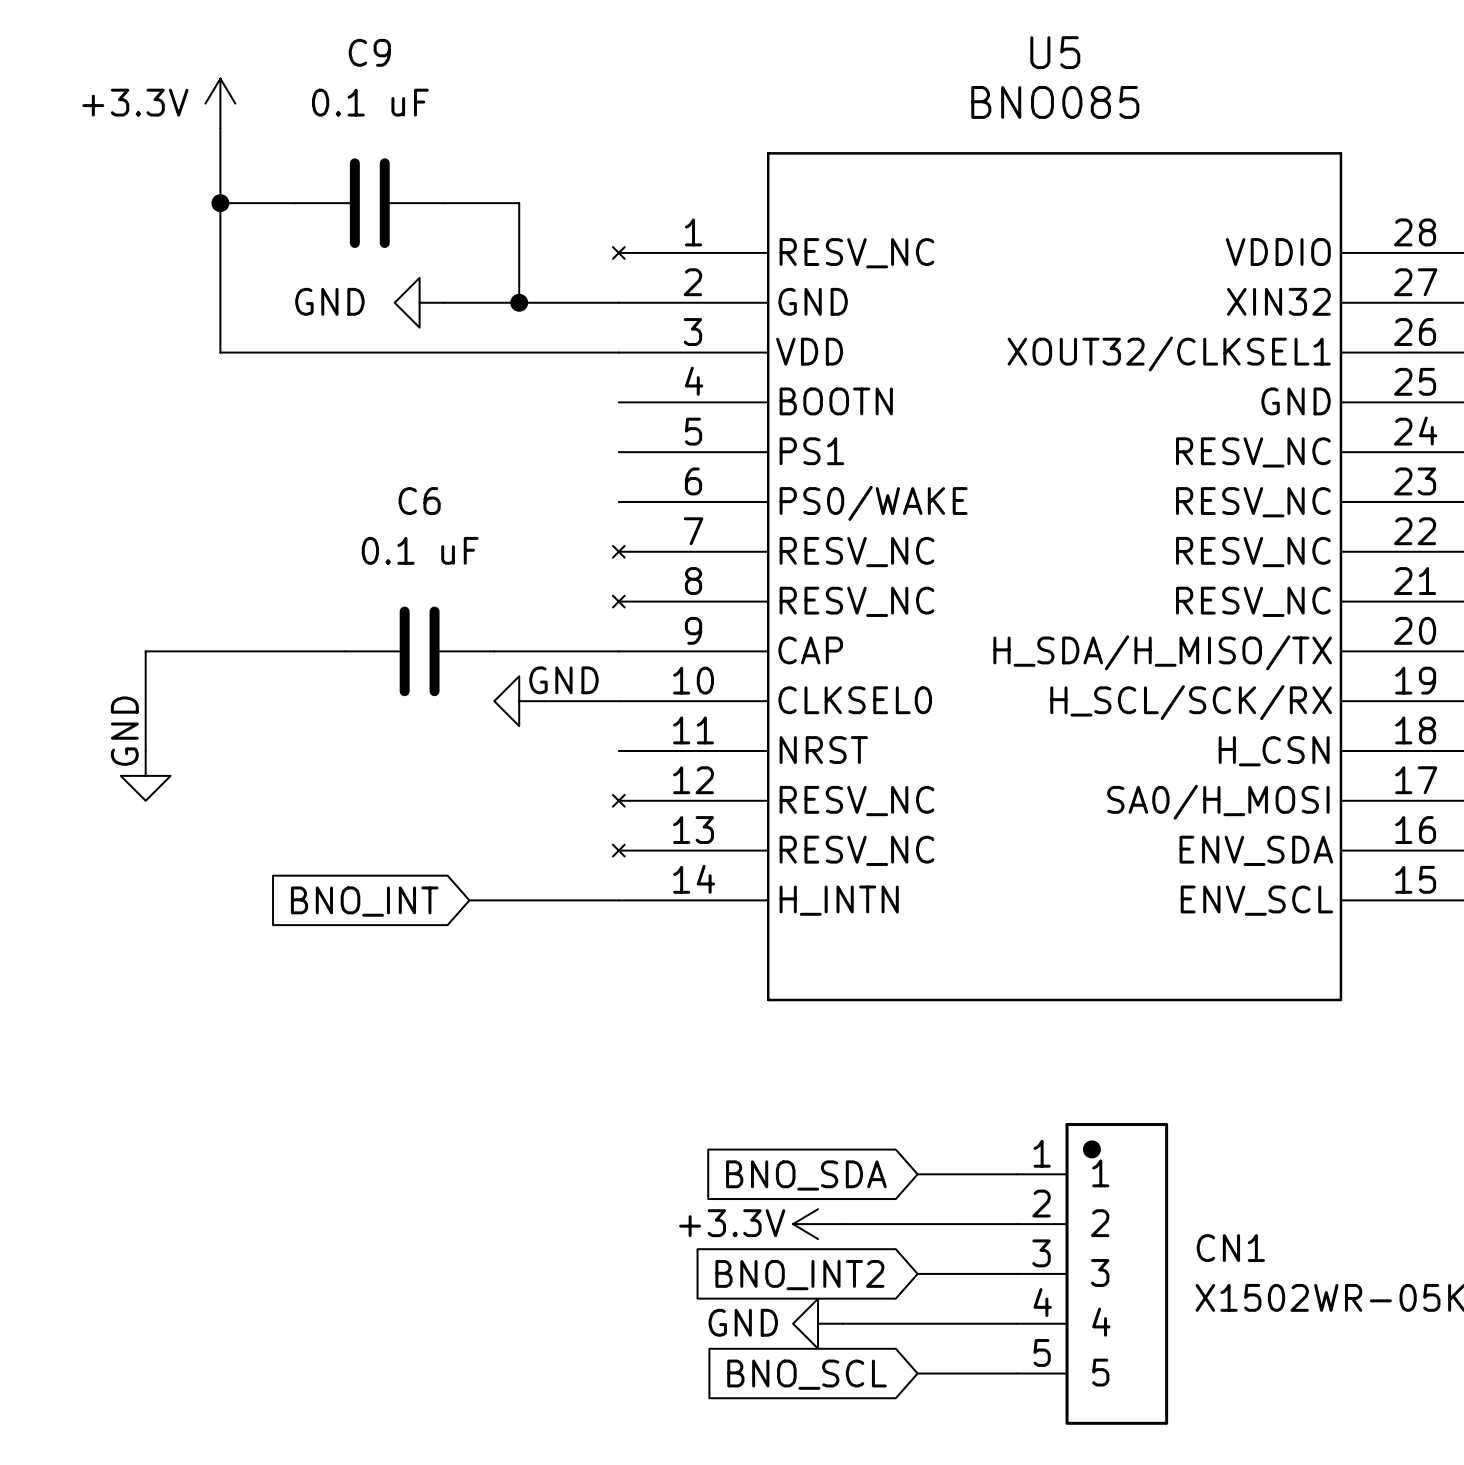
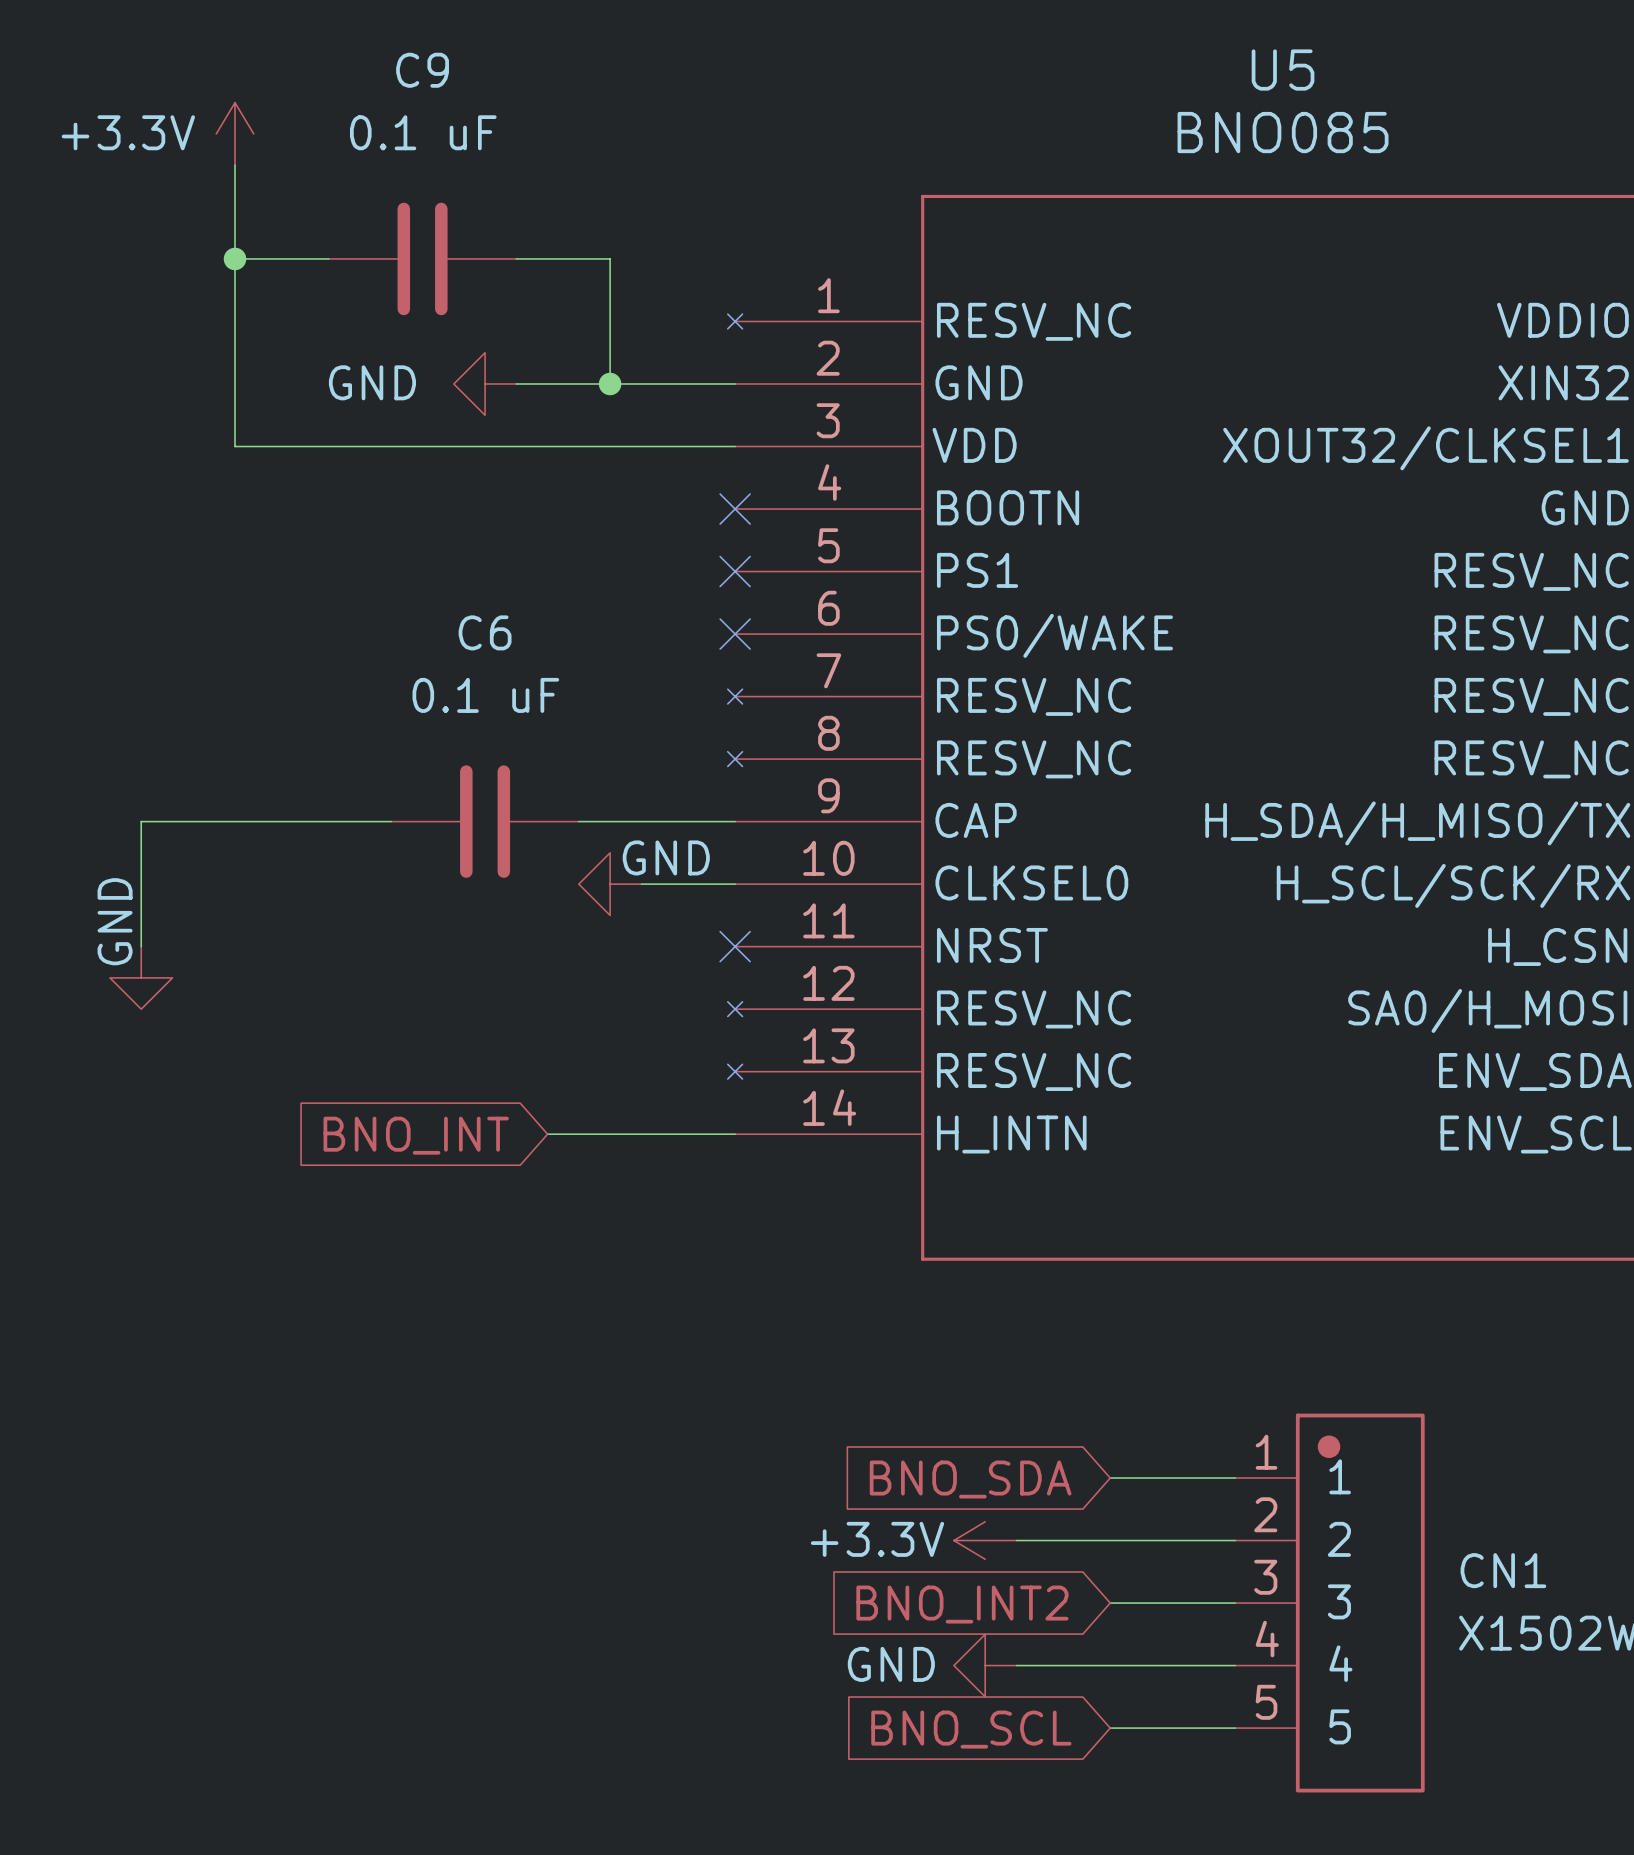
no-connect mark: none -> (735, 509)
no-connect mark: none -> (735, 571)
no-connect mark: none -> (735, 634)
no-connect mark: none -> (735, 946)

